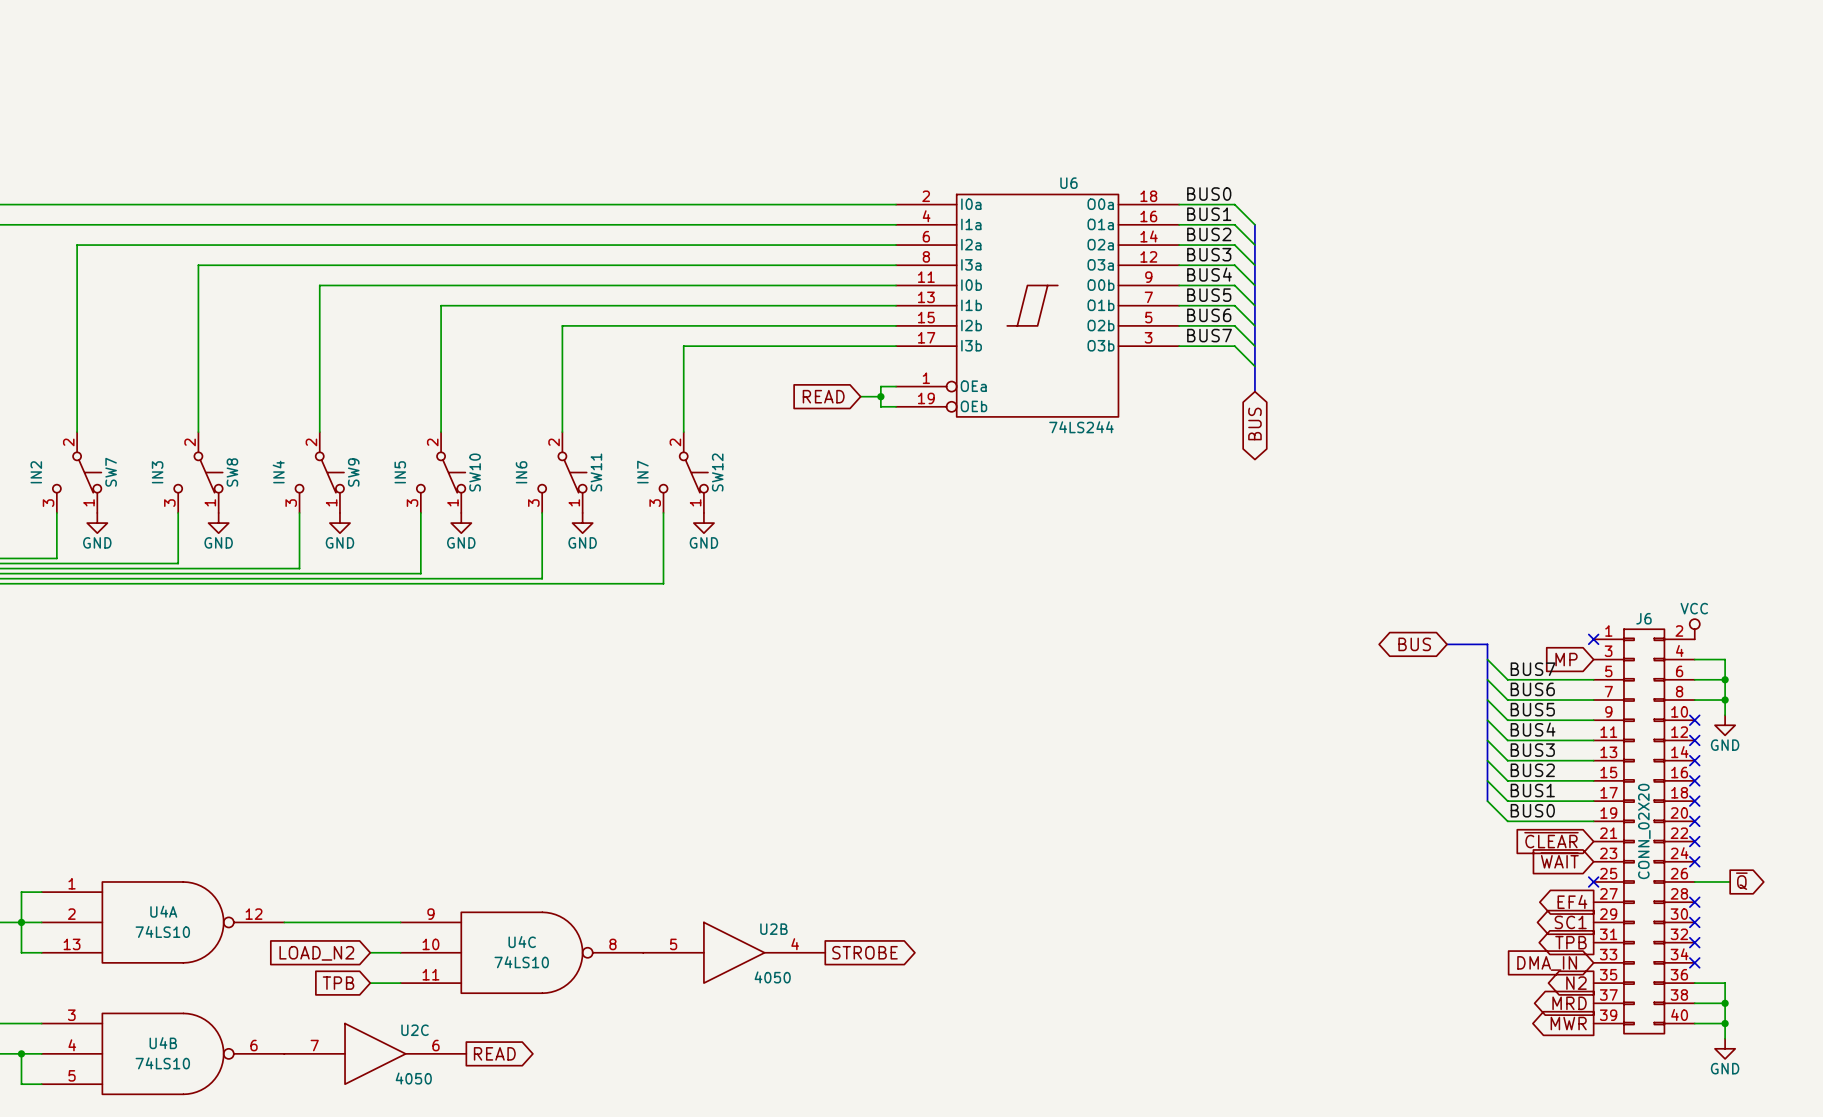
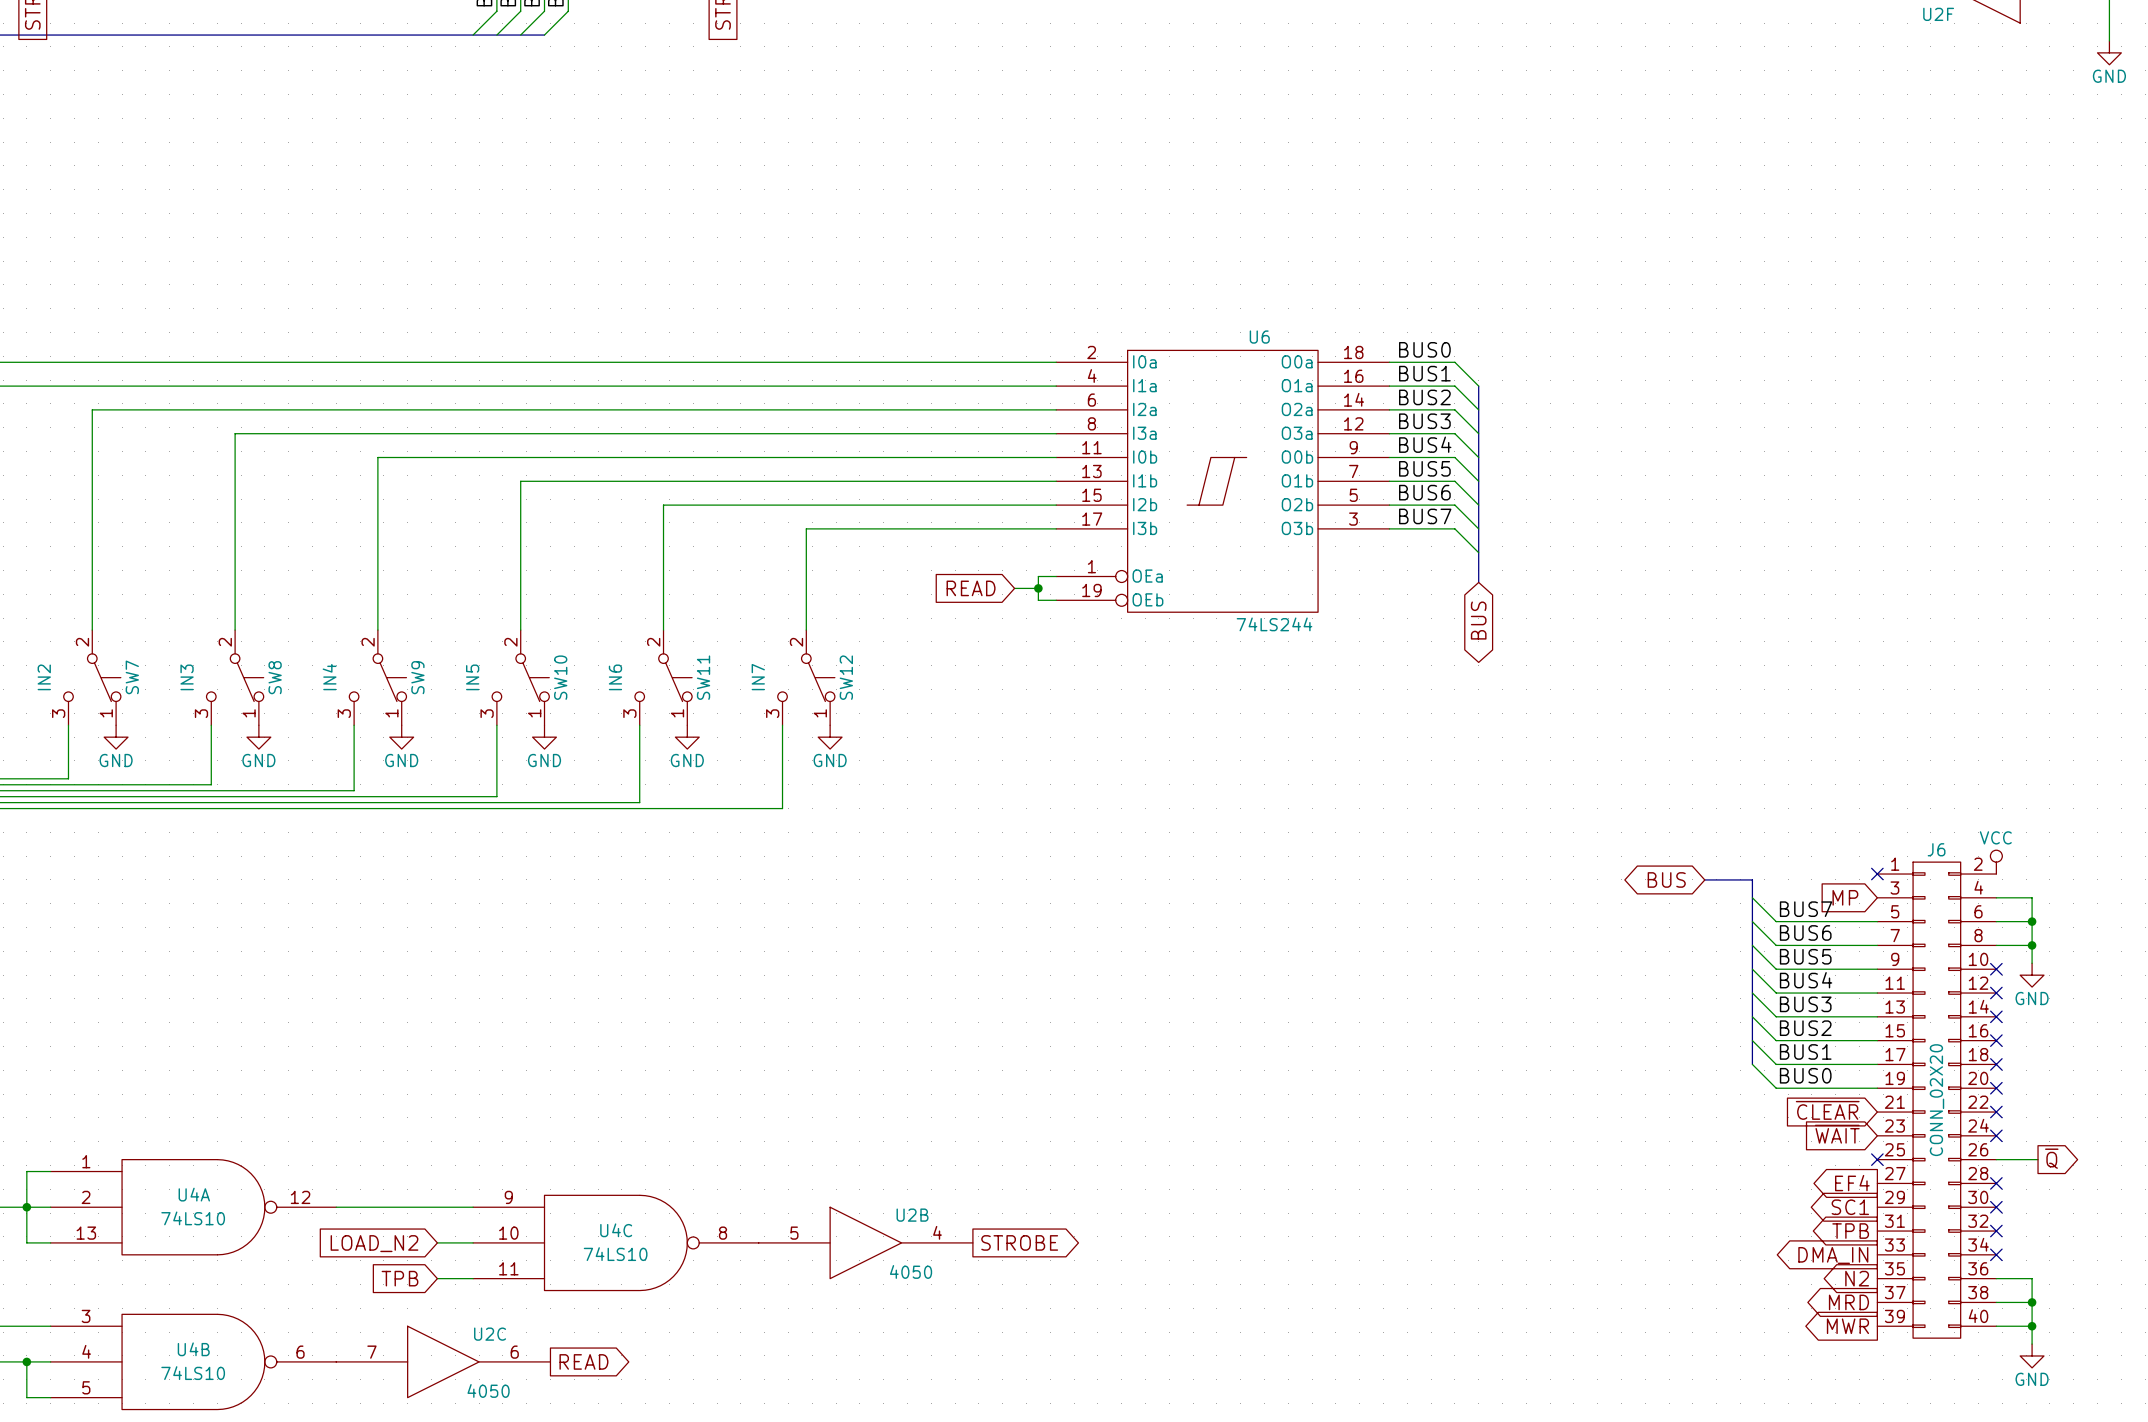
global label shape: input (1547, 963) -> output (1833, 1255)

